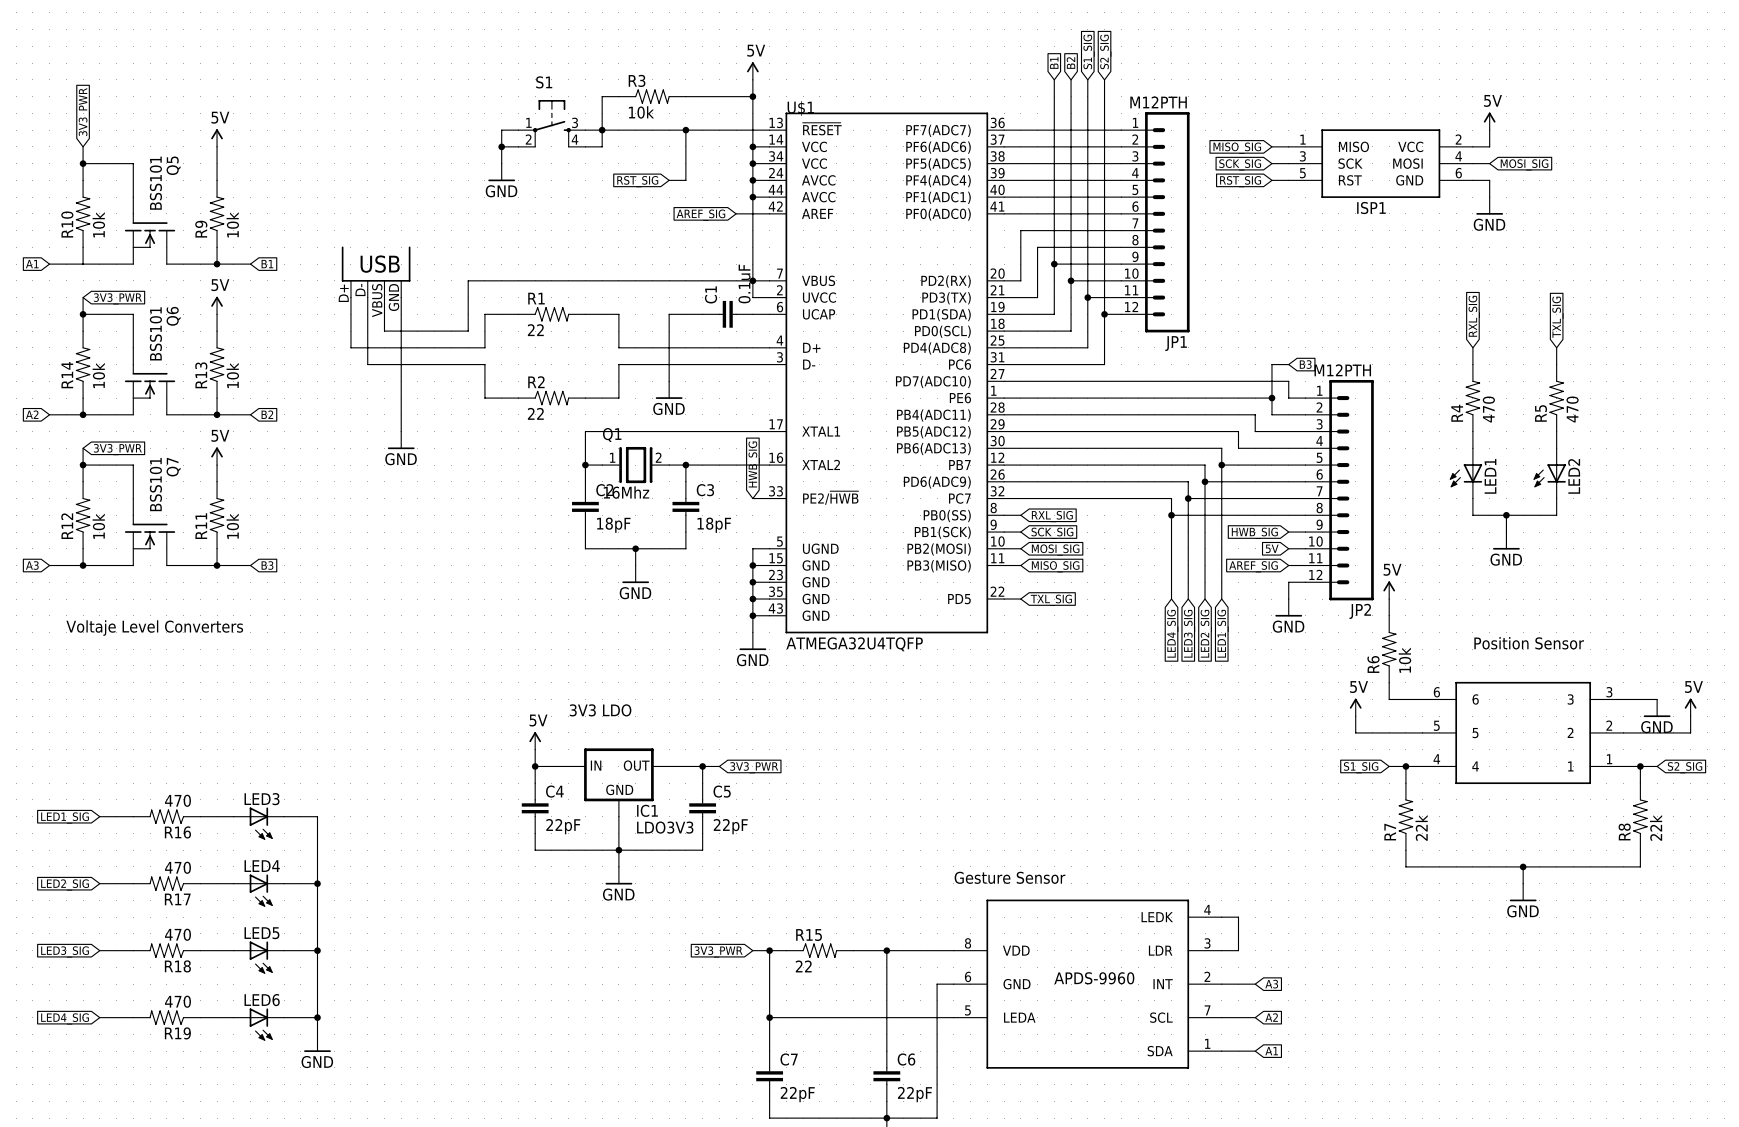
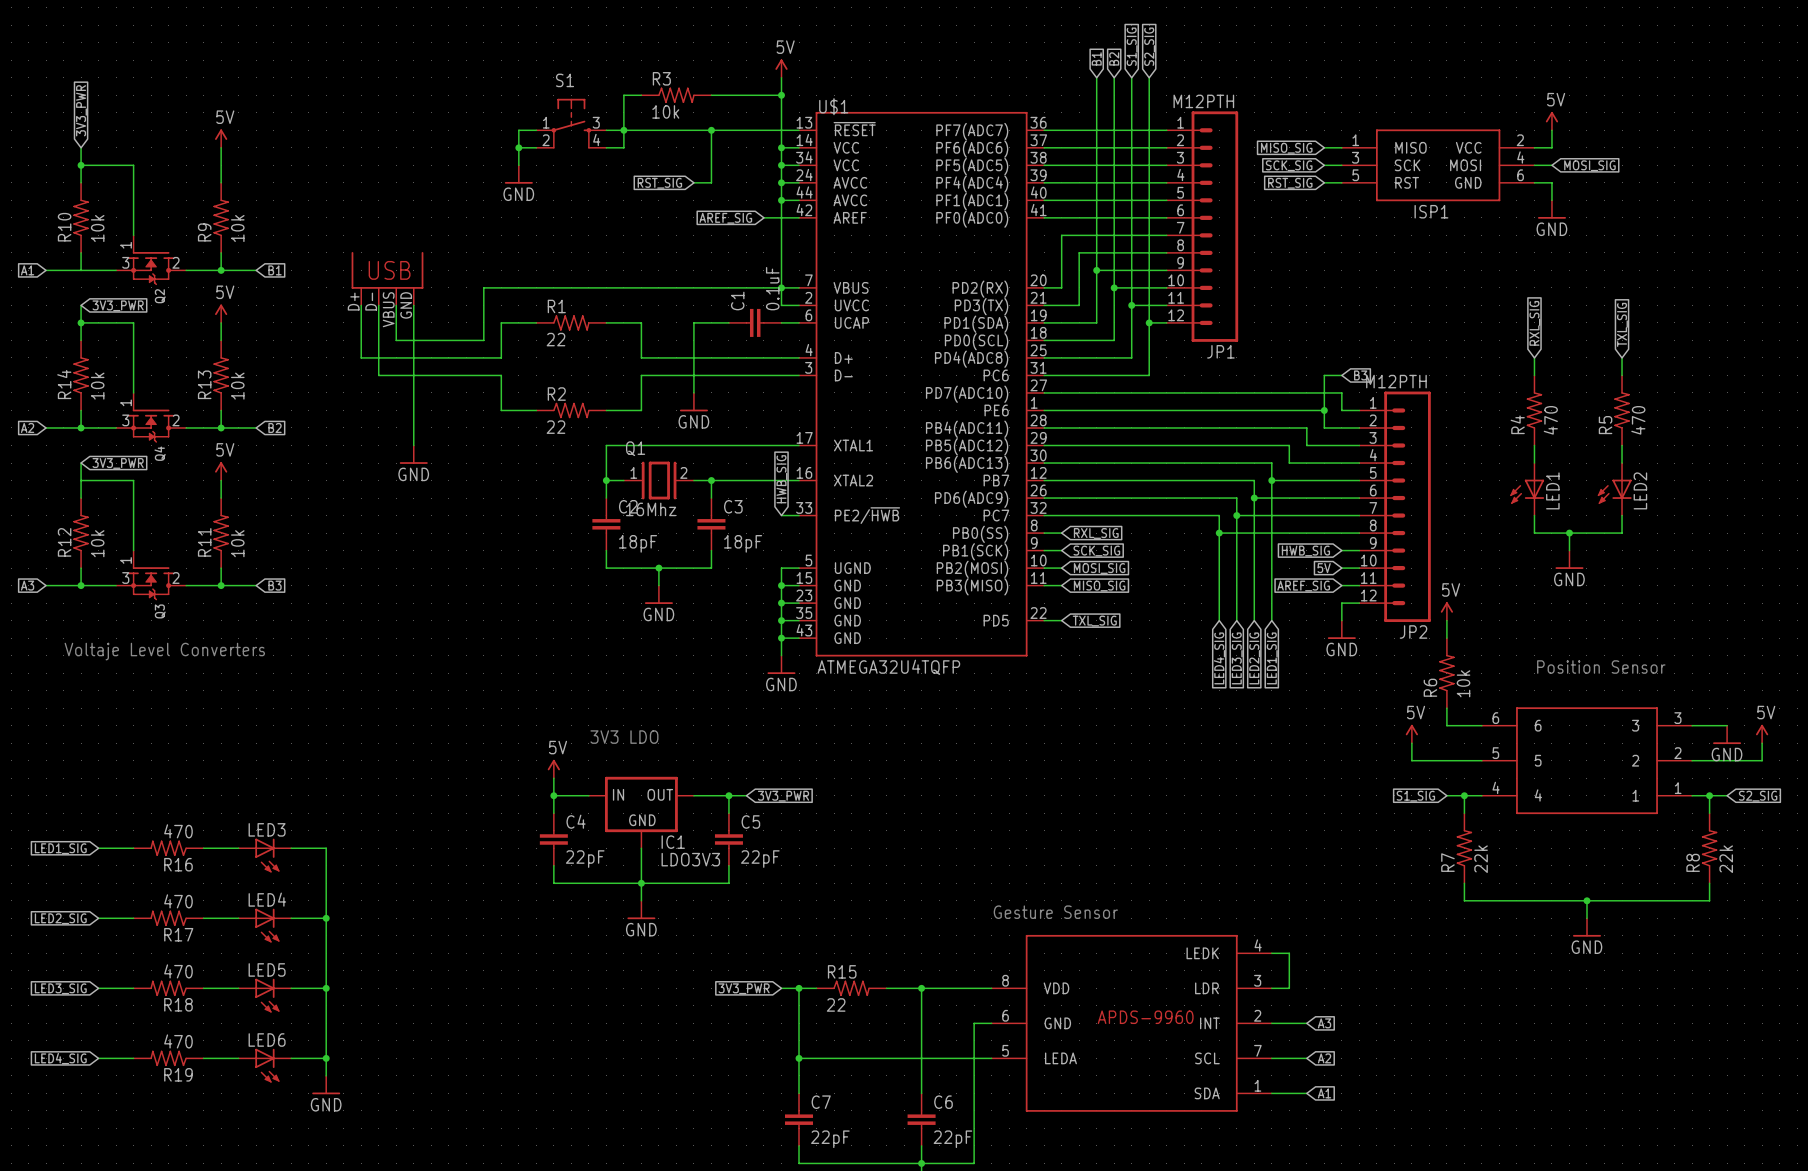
Q5: BSS101 (150, 230) -> none
Q2: none -> (151, 260)
Q6: BSS101 (150, 381) -> none
Q4: none -> (151, 417)
junction: (83, 465) -> none
Q7: BSS101 (150, 532) -> none
Q3: none -> (151, 575)

